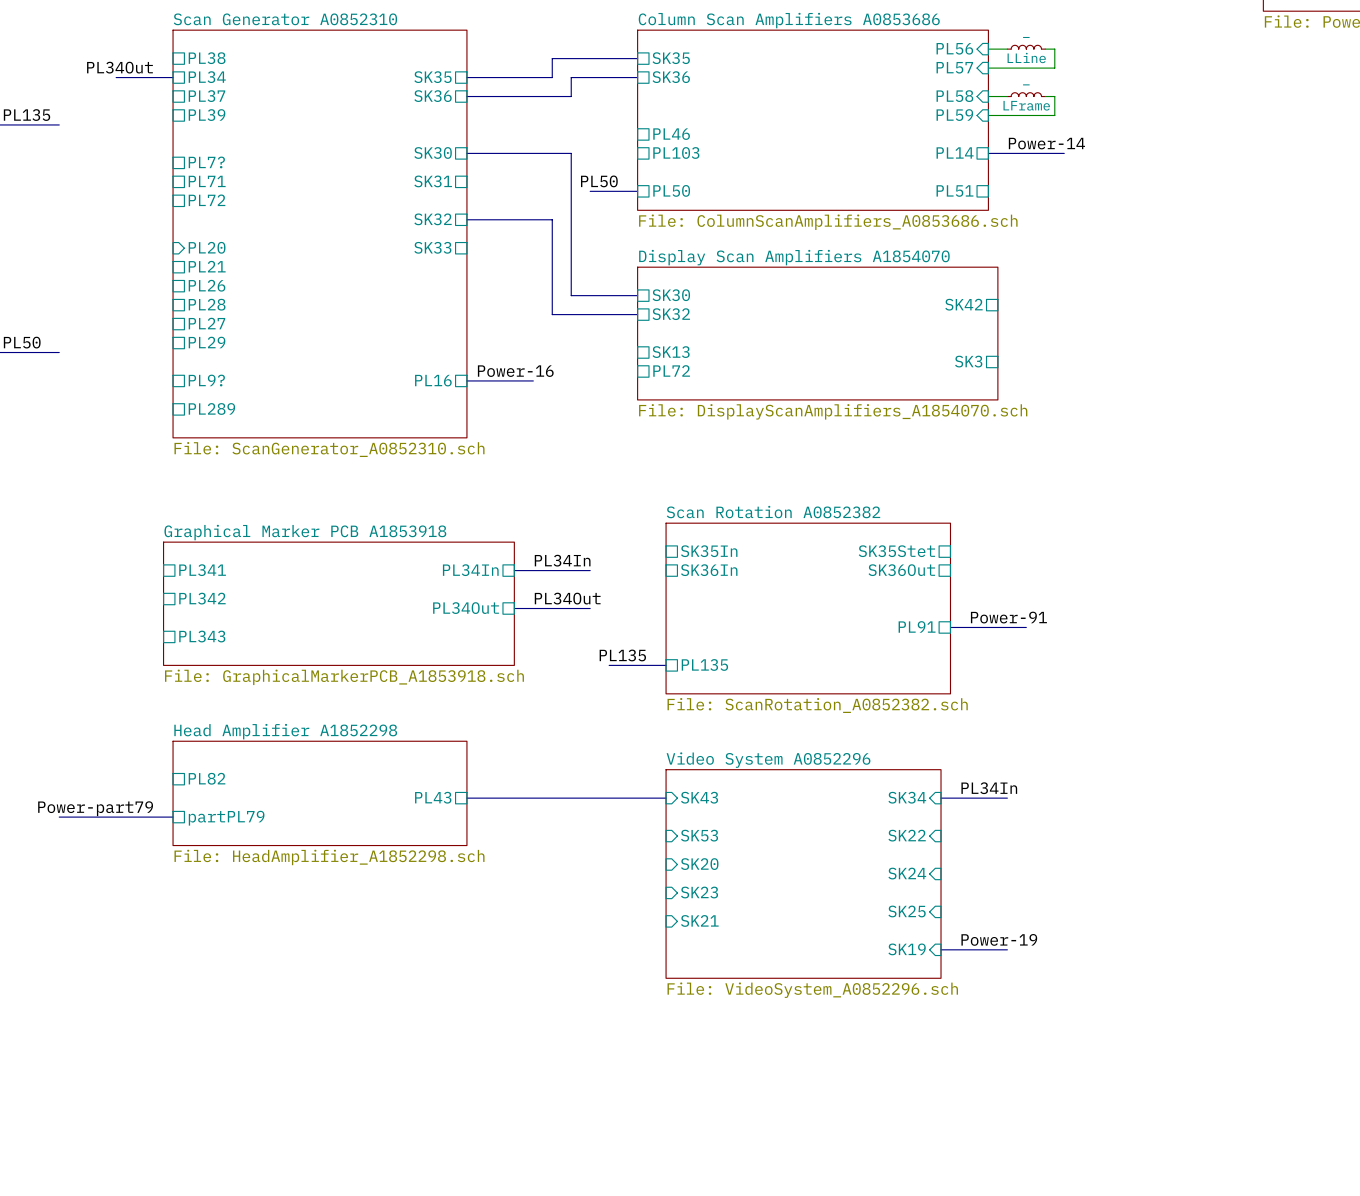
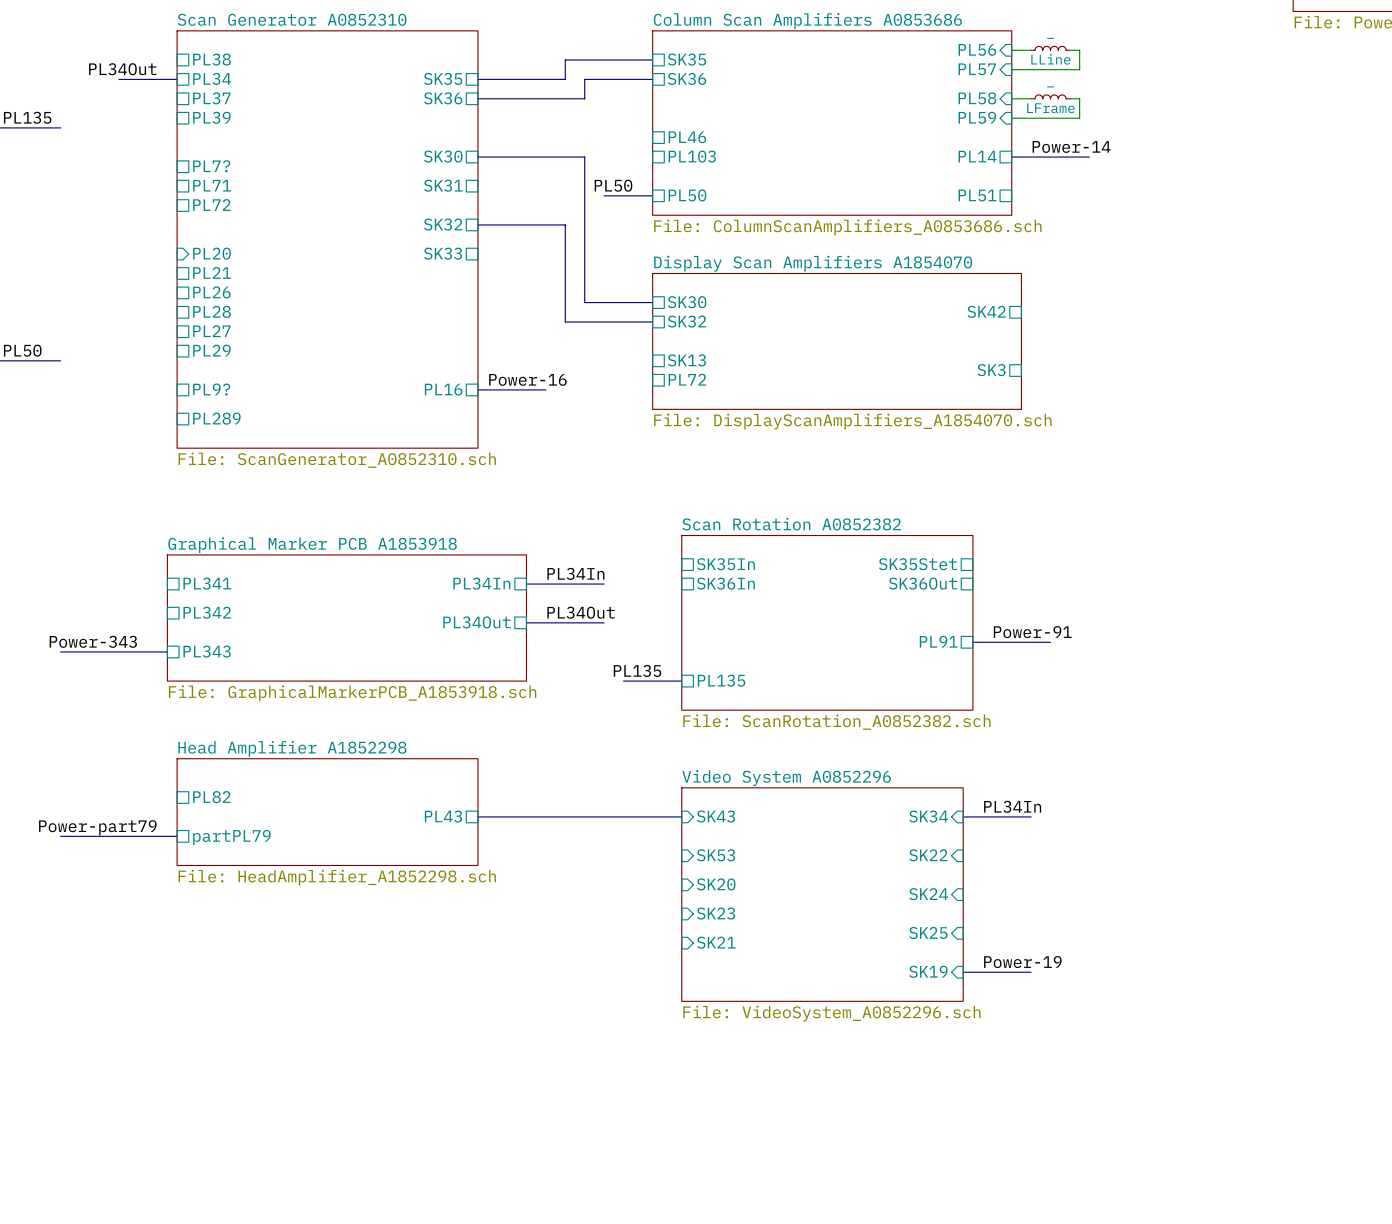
label: none -> Power-343 (93, 641)
bus: none -> (60, 651) (167, 651)

